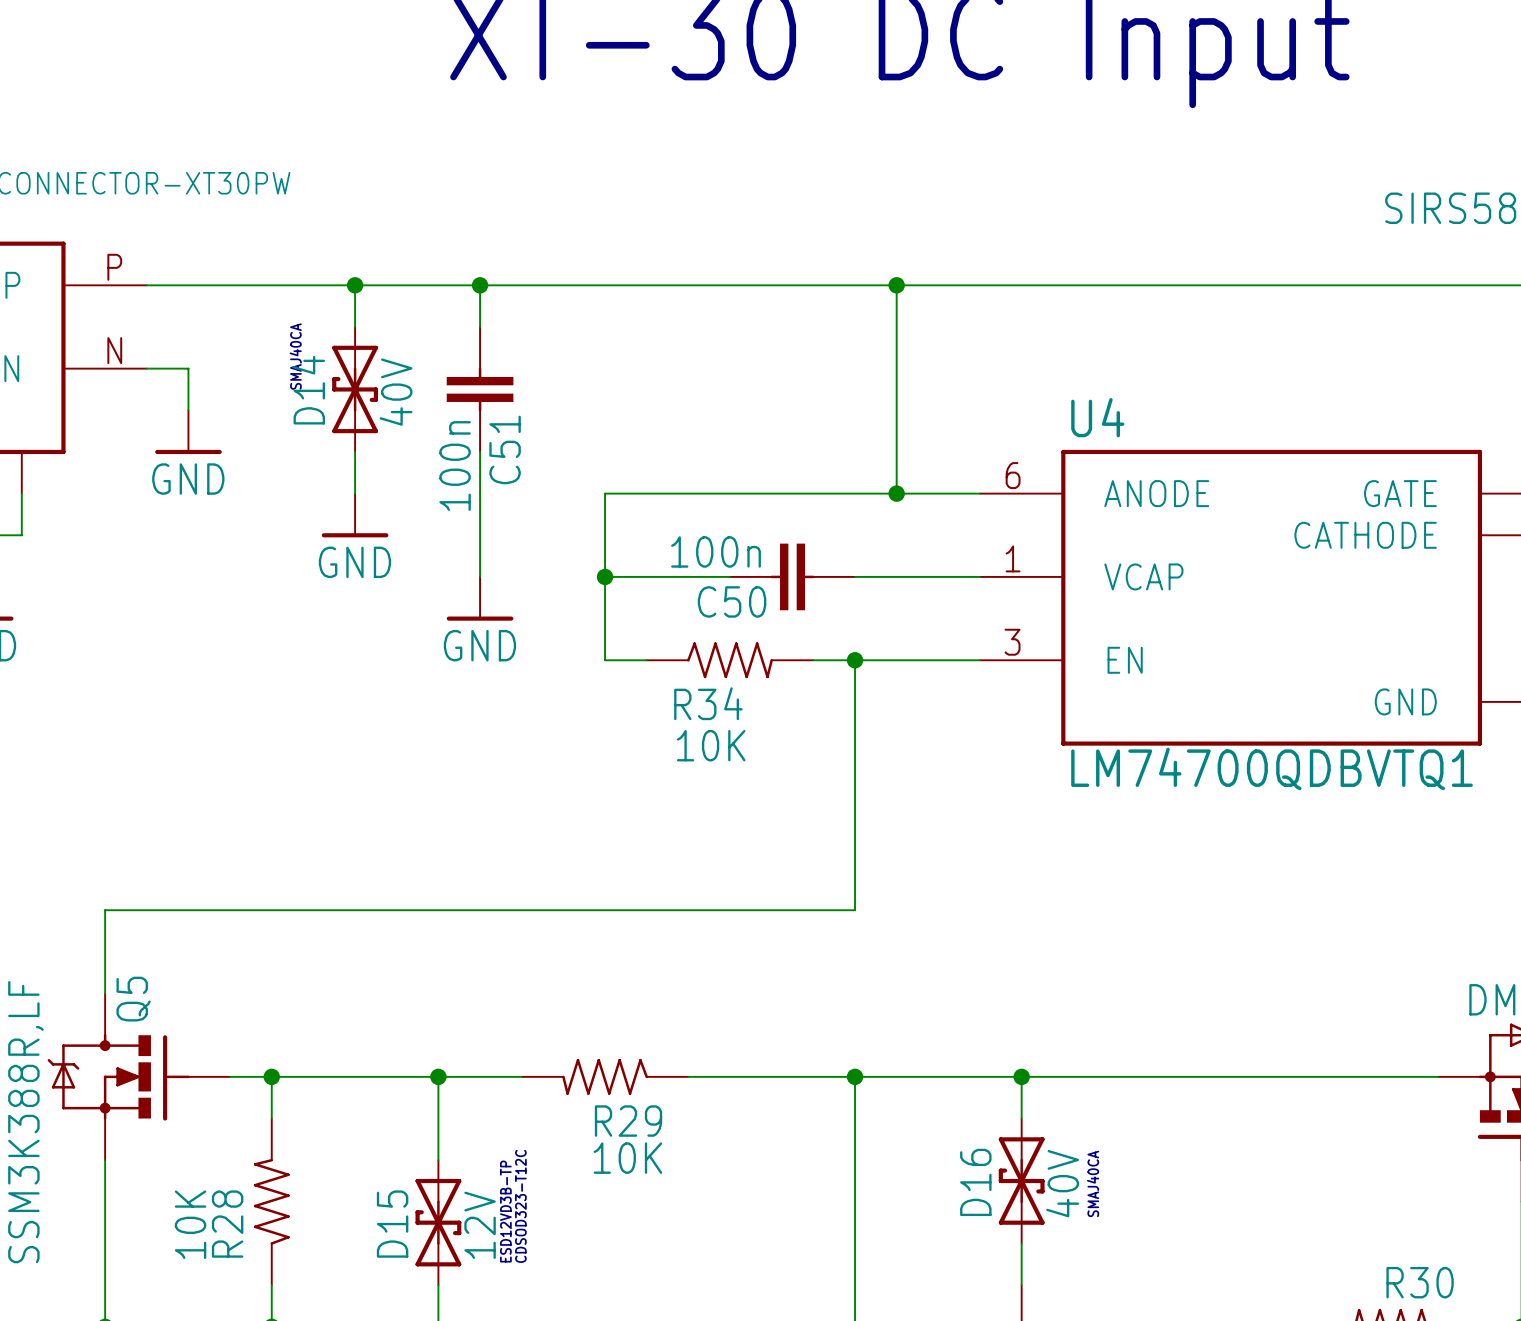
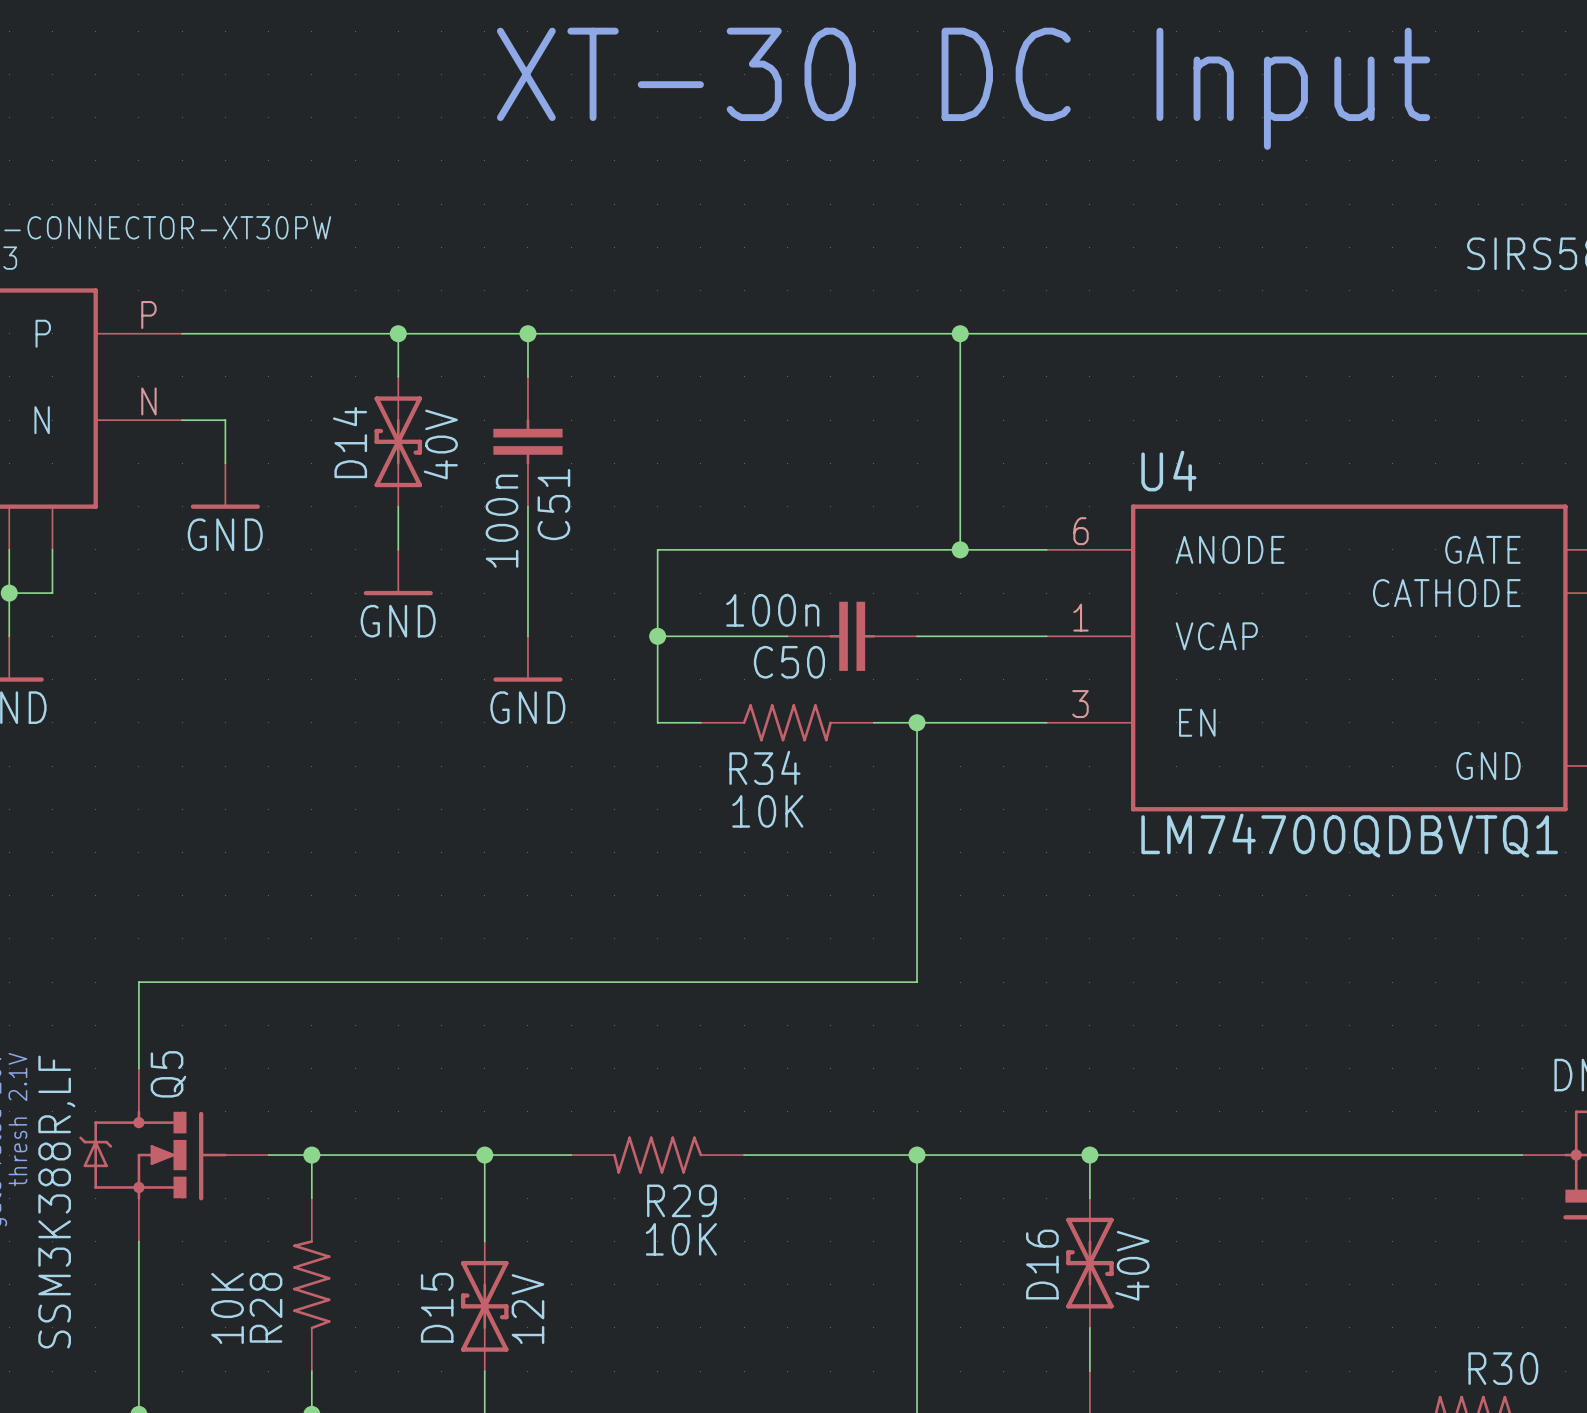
text: SMAJ40CA (295, 356) -> none
text: SMAJ40CA (1093, 1183) -> none
text: CDSOD323-T12C (520, 1206) -> none
text: ESD12VD3B-TP (505, 1211) -> none

